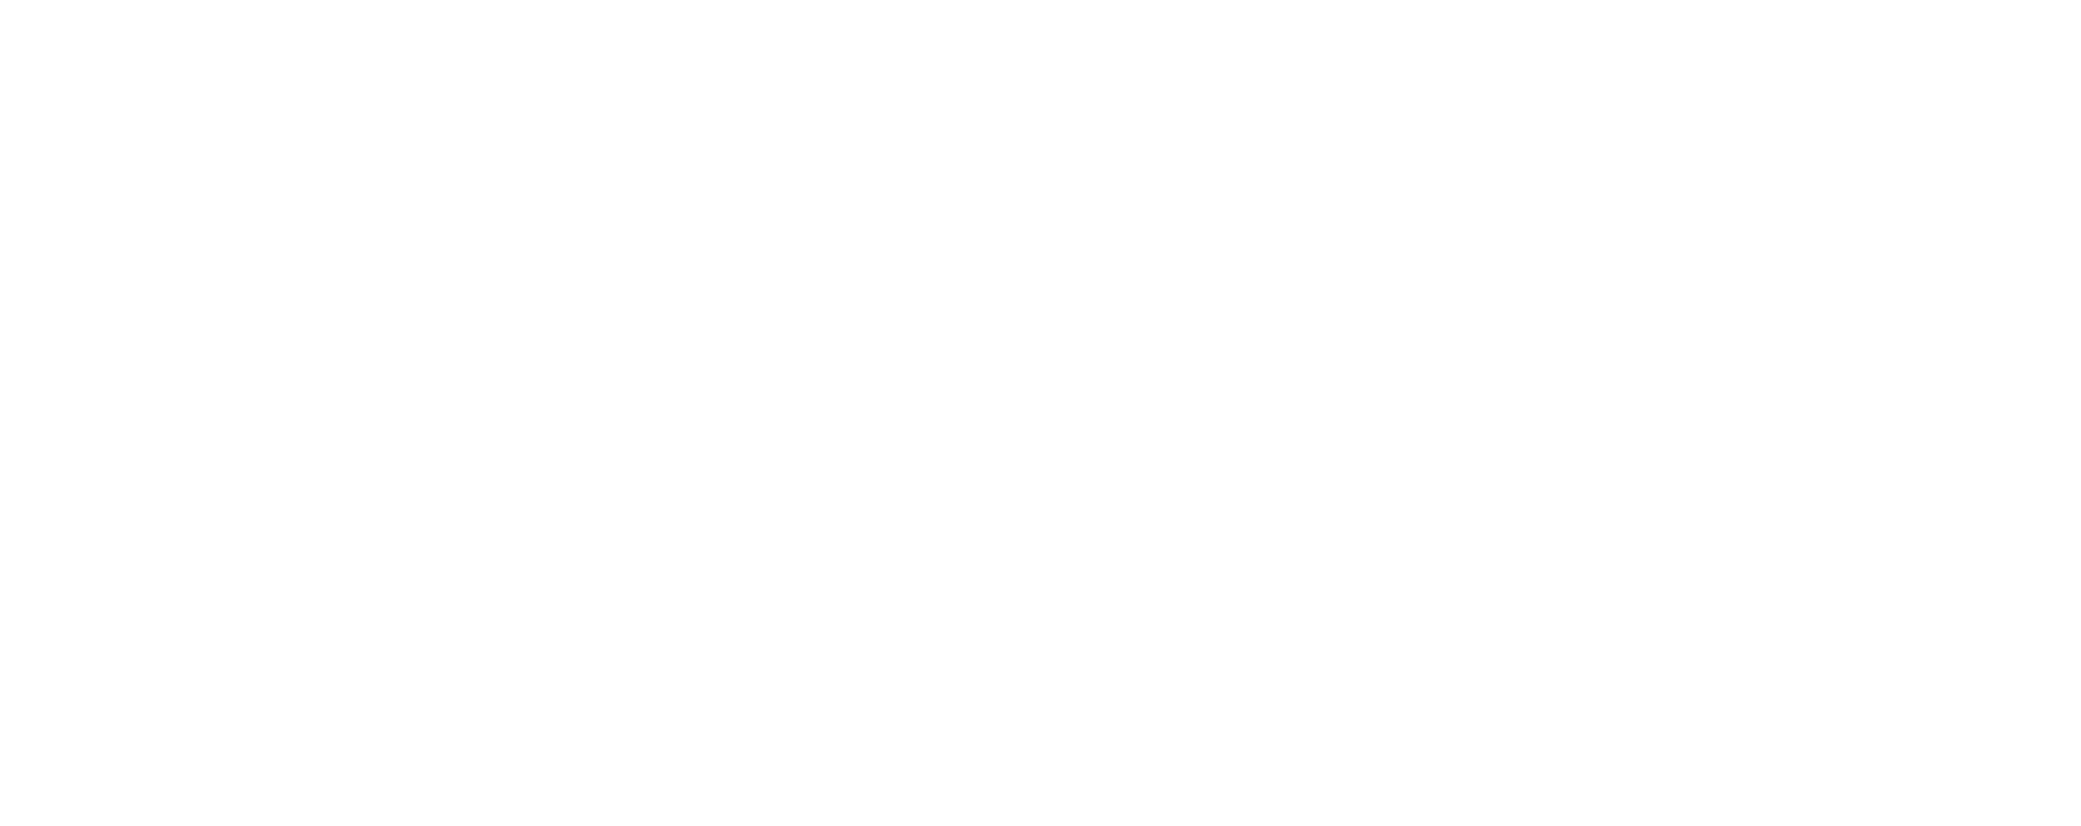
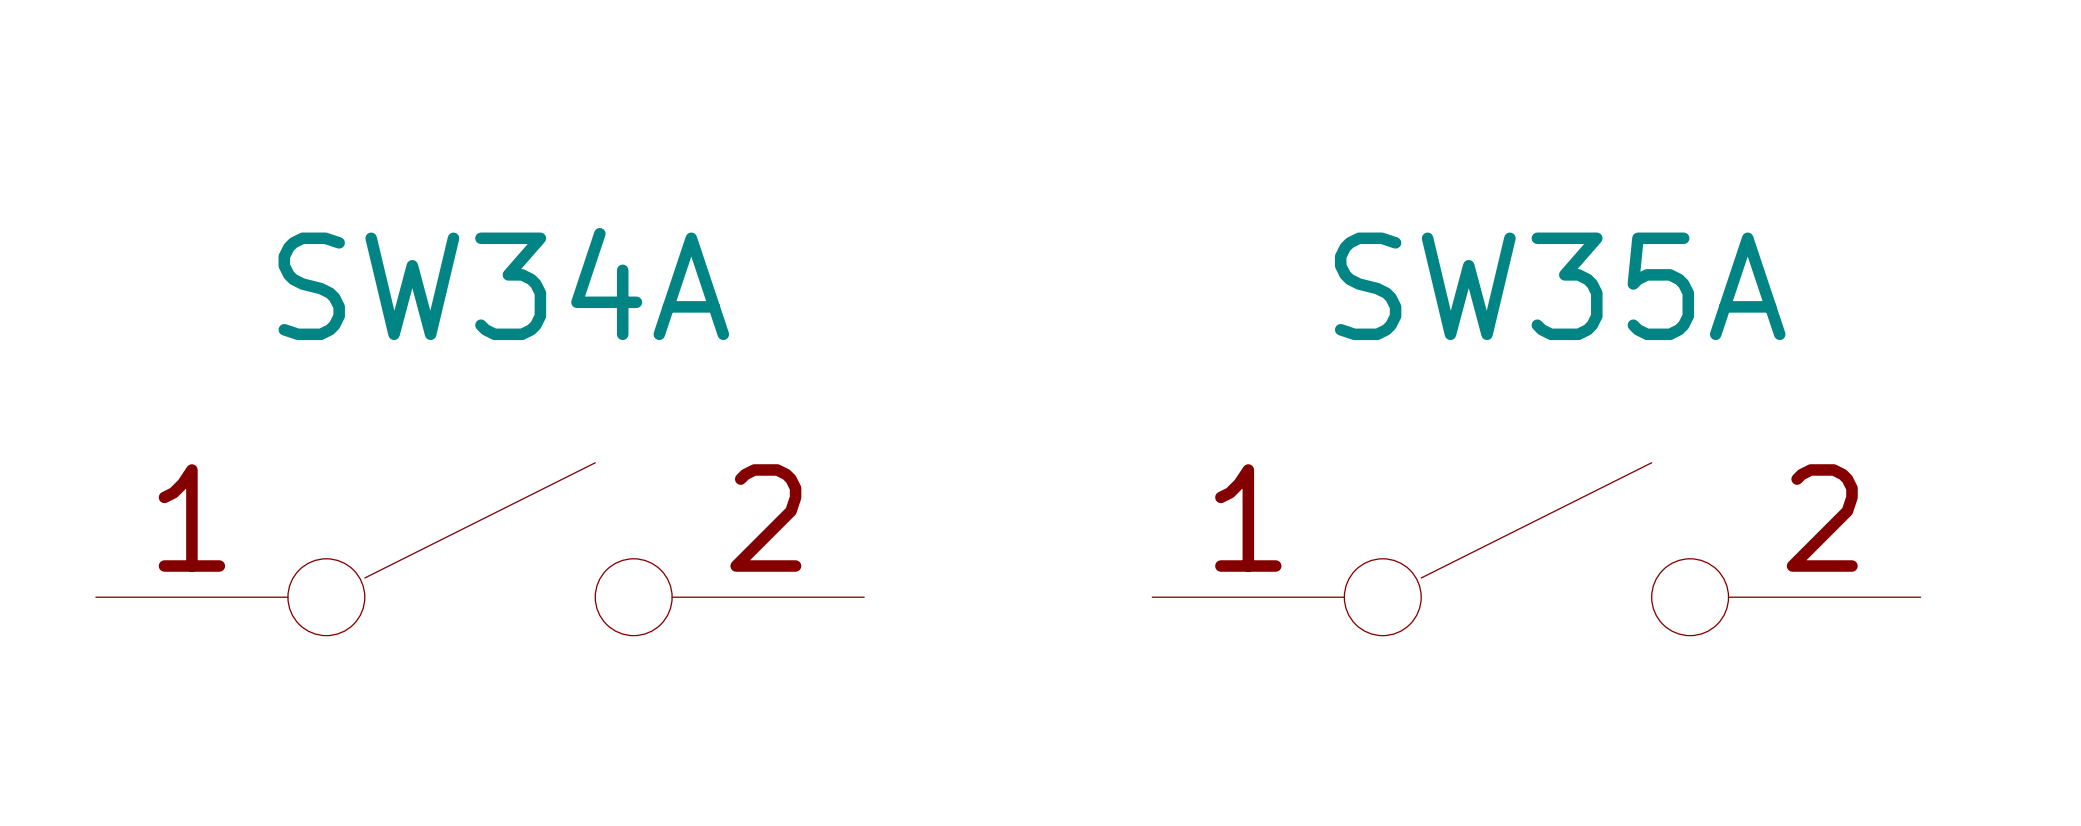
SW34A: none -> (480, 549)
SW35A: none -> (1536, 549)

